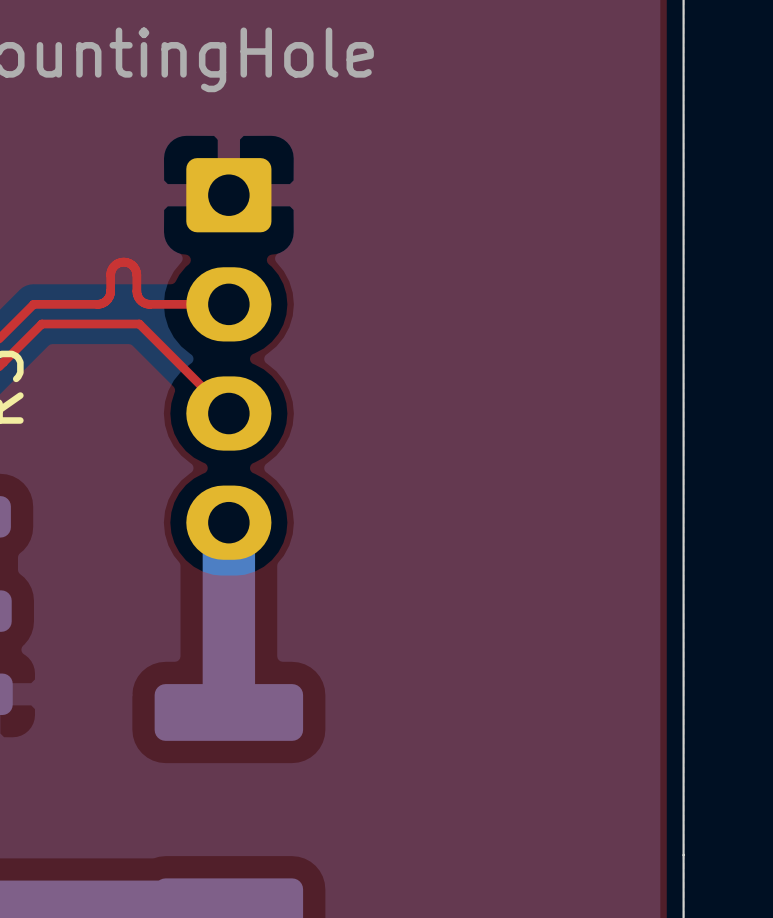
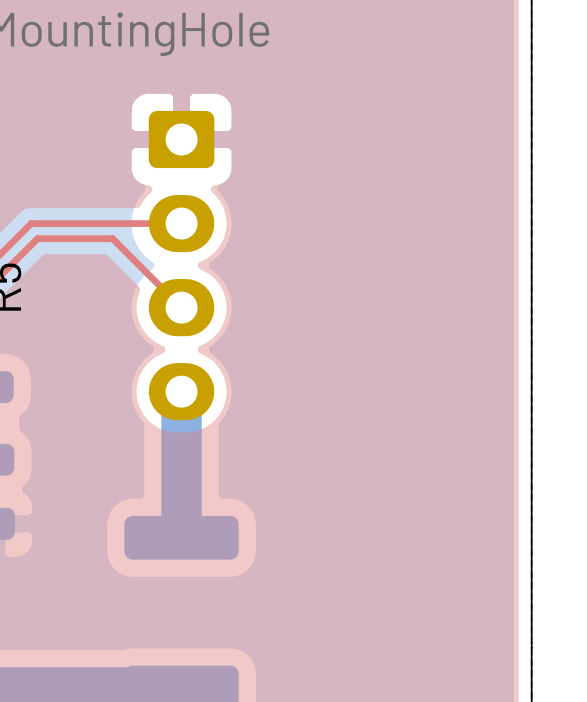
top track: (97, 304) (103, 303) (109, 296) (111, 269) (118, 263) (123, 262) (129, 263) (135, 269) (138, 296) (144, 303) (149, 304) -> (80, 223) (120, 223)

